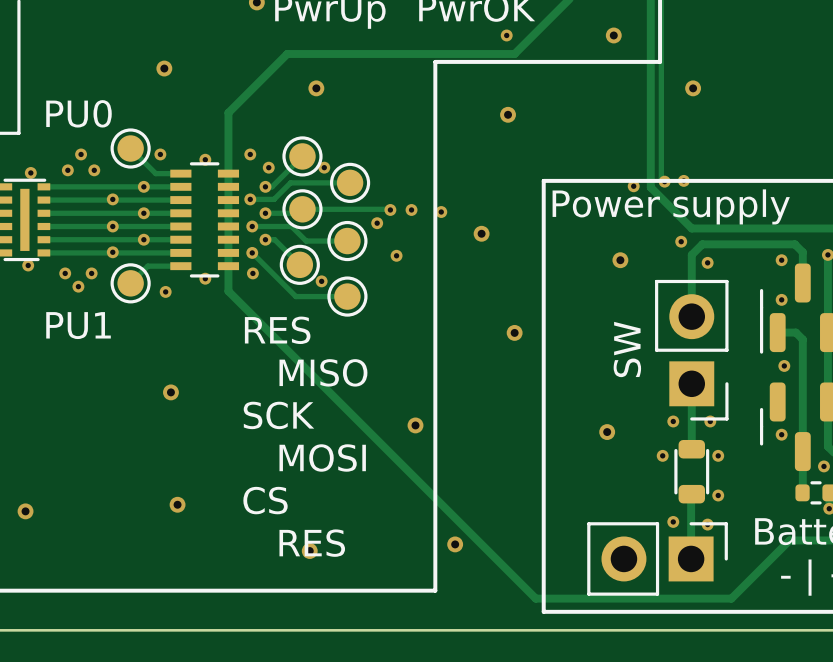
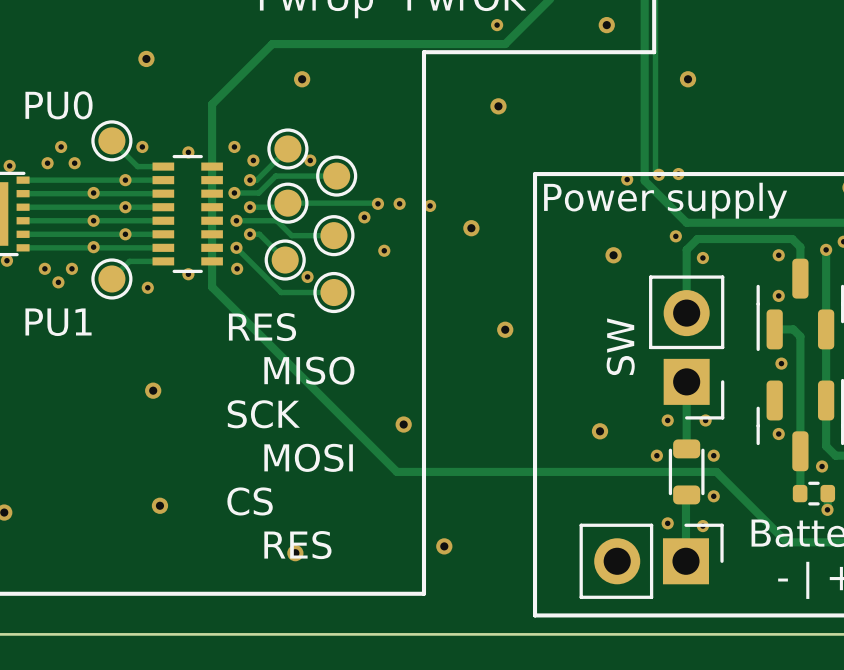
track: (408, 471) (535, 598) (731, 598) (789, 540) -> (396, 471) (716, 471) (786, 542)

